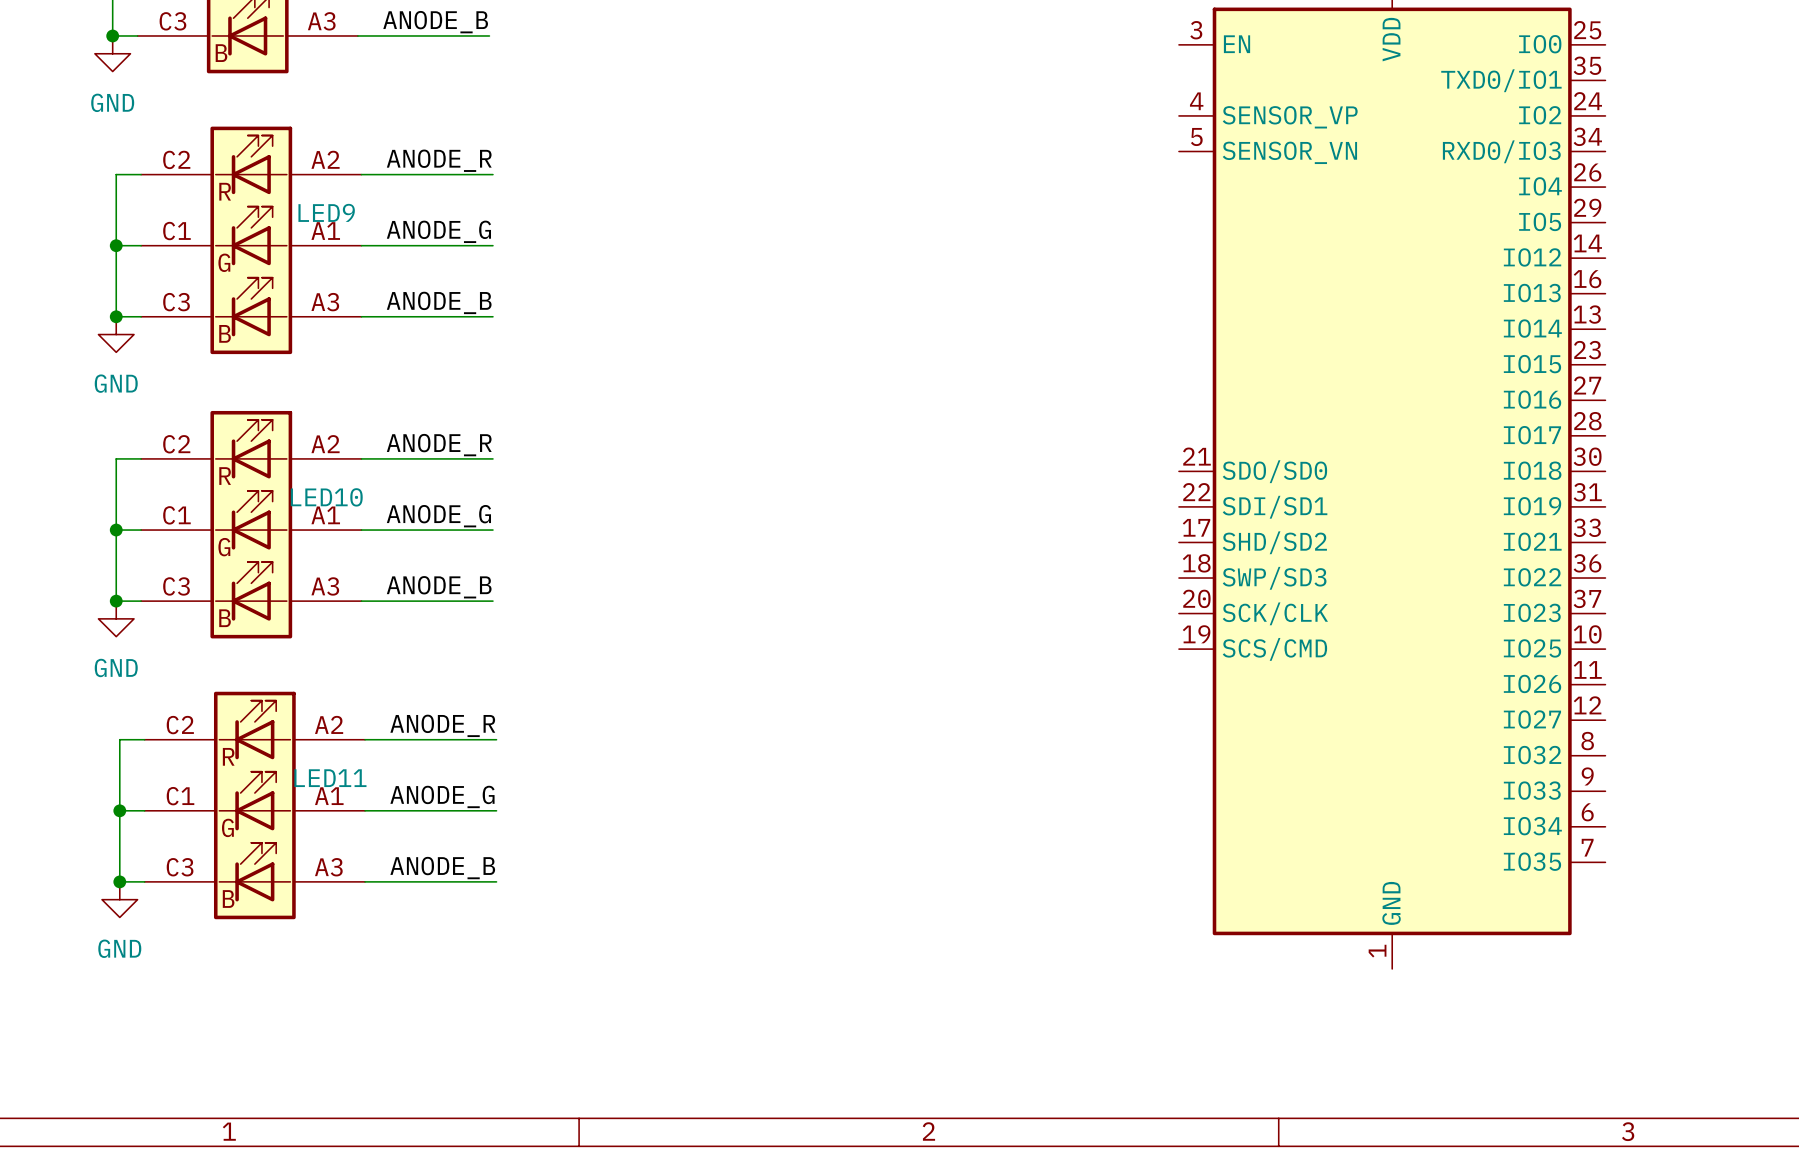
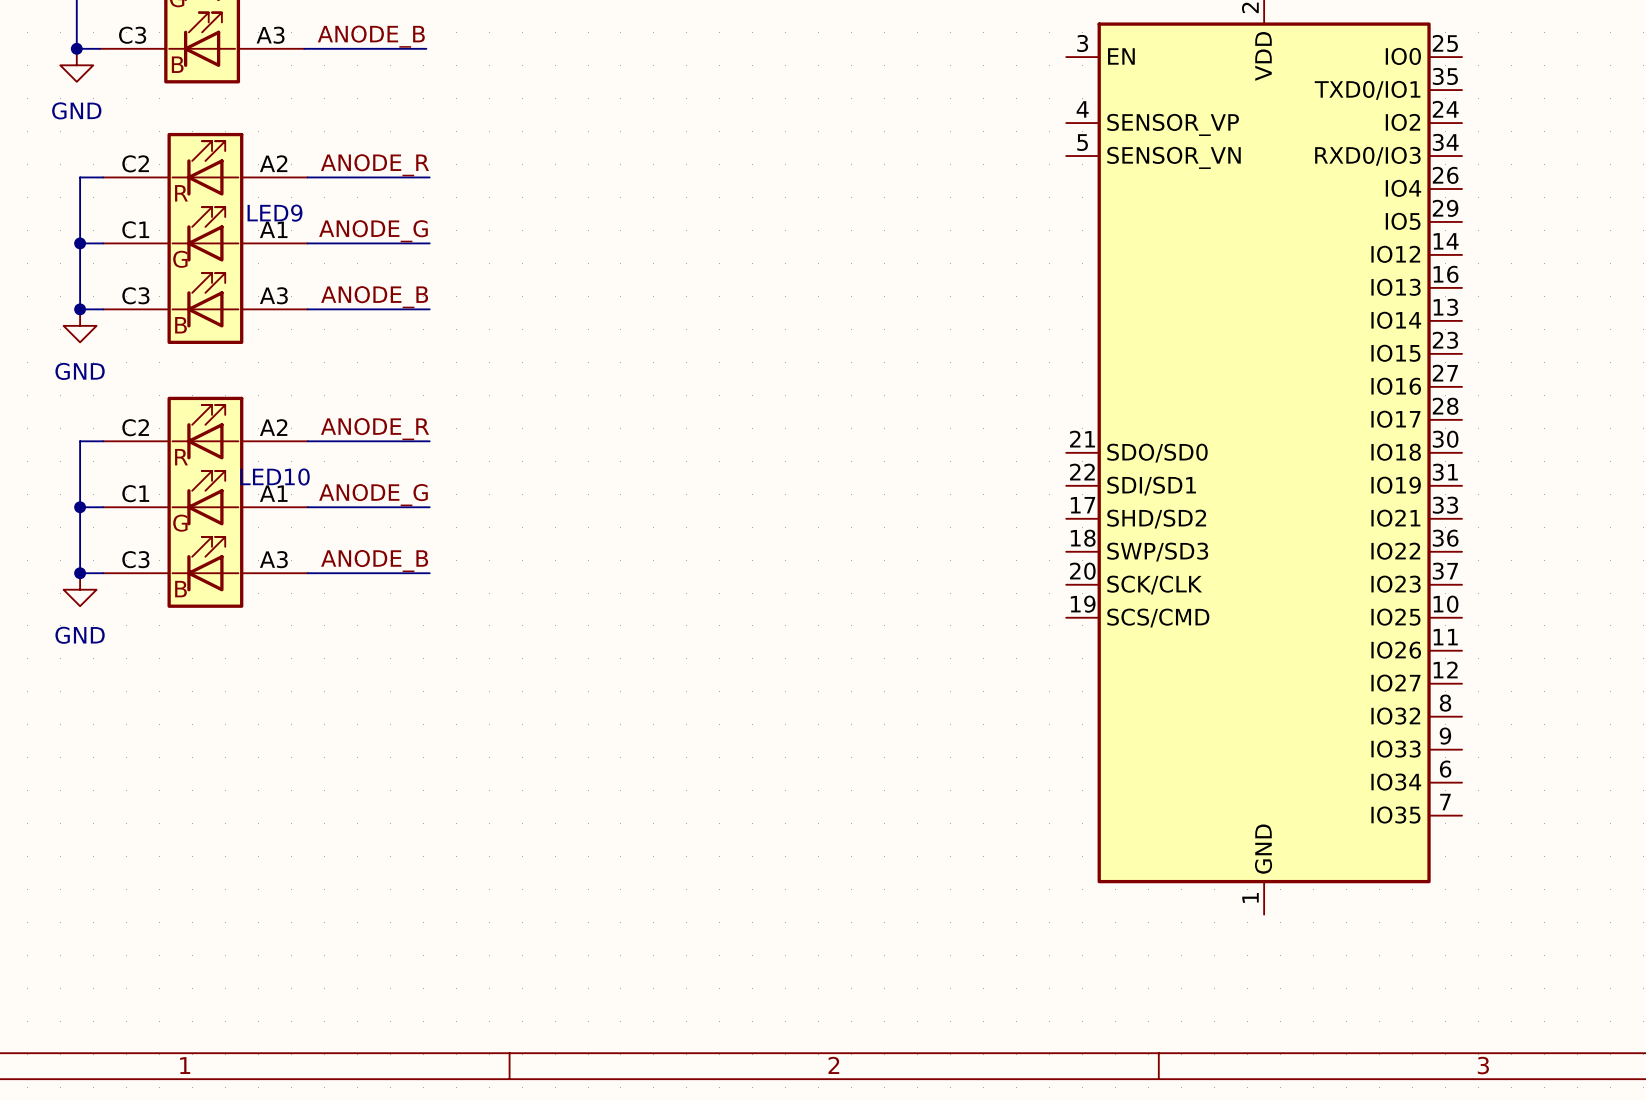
label: ANODE_R (442, 725) -> none
wire: (144, 739) (119, 739) (119, 881) (144, 881) -> none
wire: (365, 739) (496, 739) -> none
label: ANODE_G (442, 796) -> none
LED11: (254, 805) -> none
wire: (119, 810) (144, 810) -> none
junction: (119, 810) -> none
wire: (365, 810) (496, 810) -> none
label: ANODE_B (442, 868) -> none
junction: (119, 881) -> none
wire: (365, 881) (496, 881) -> none
power symbol: GND (119, 899) -> none

